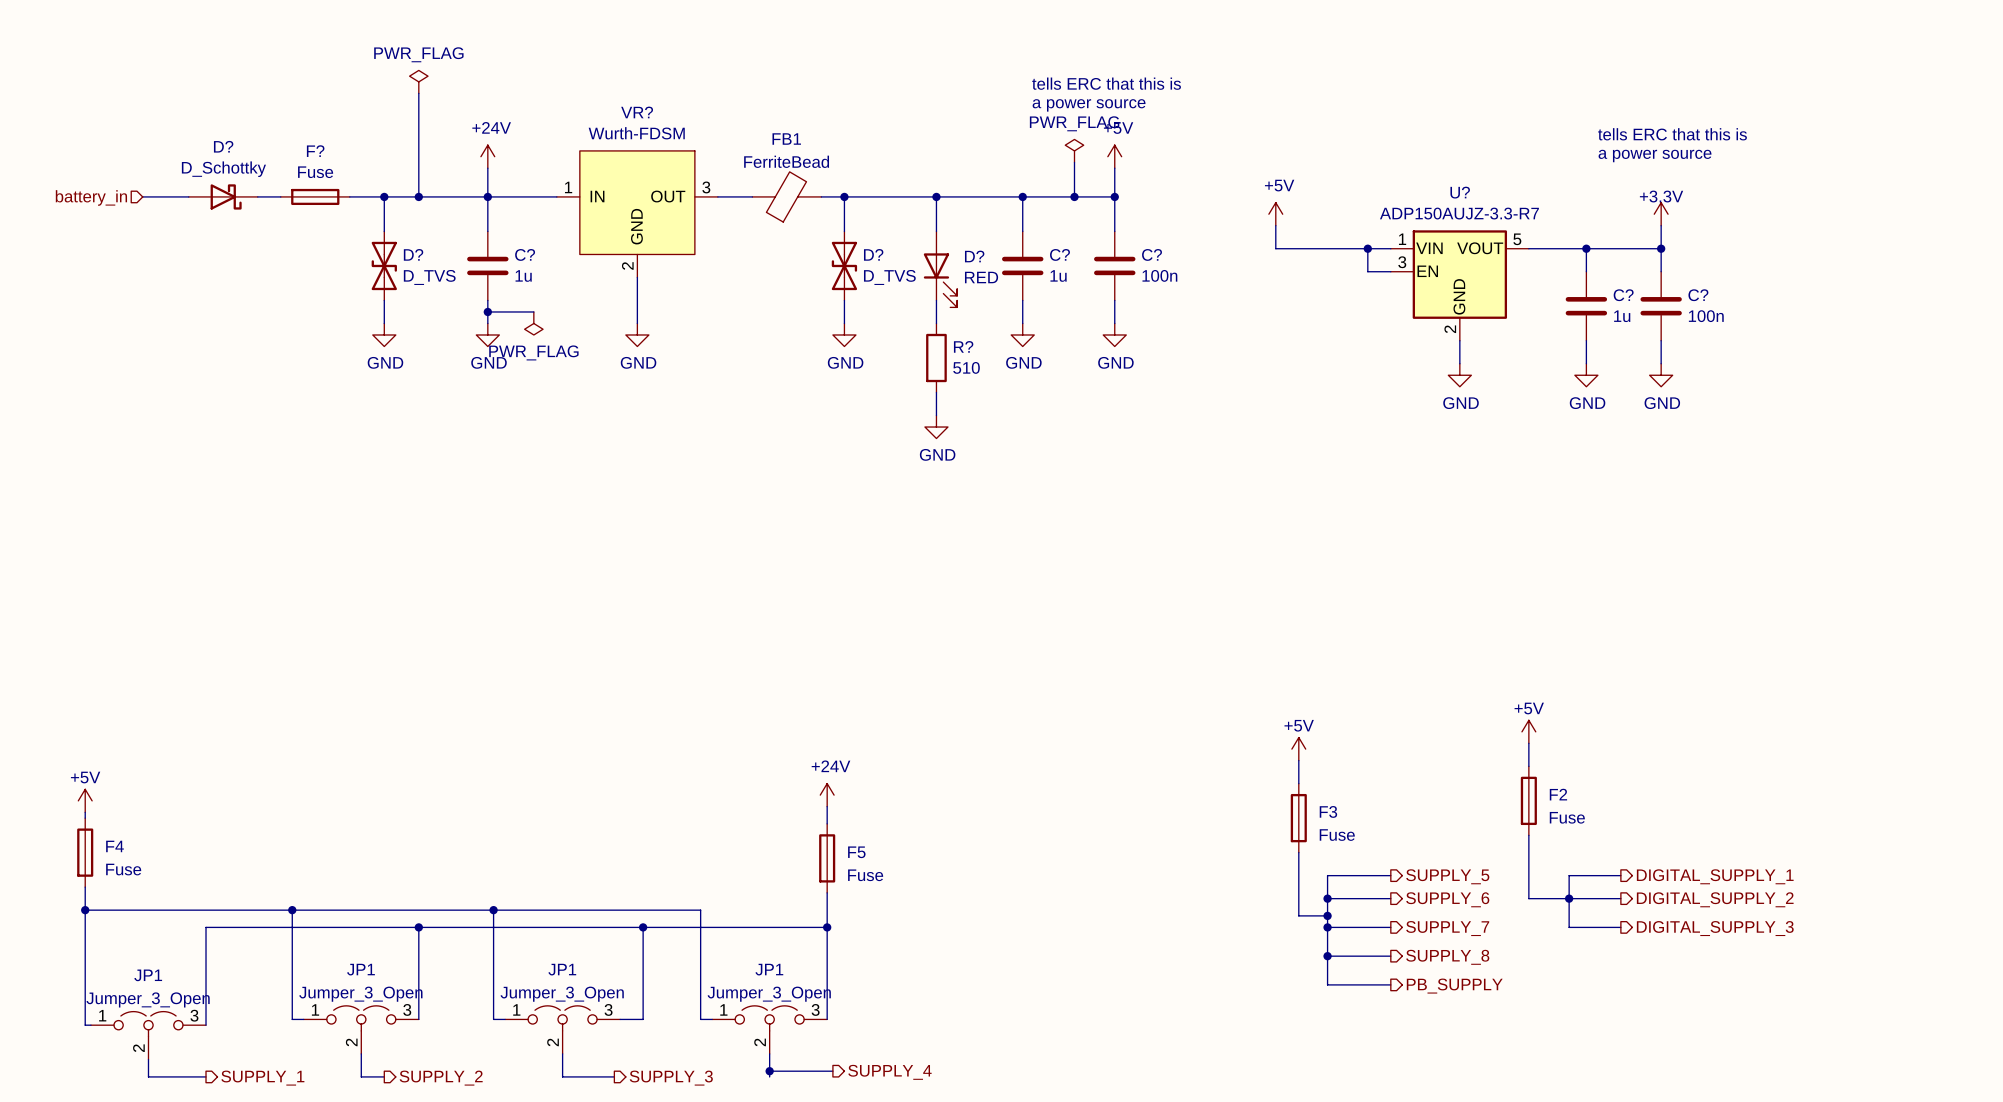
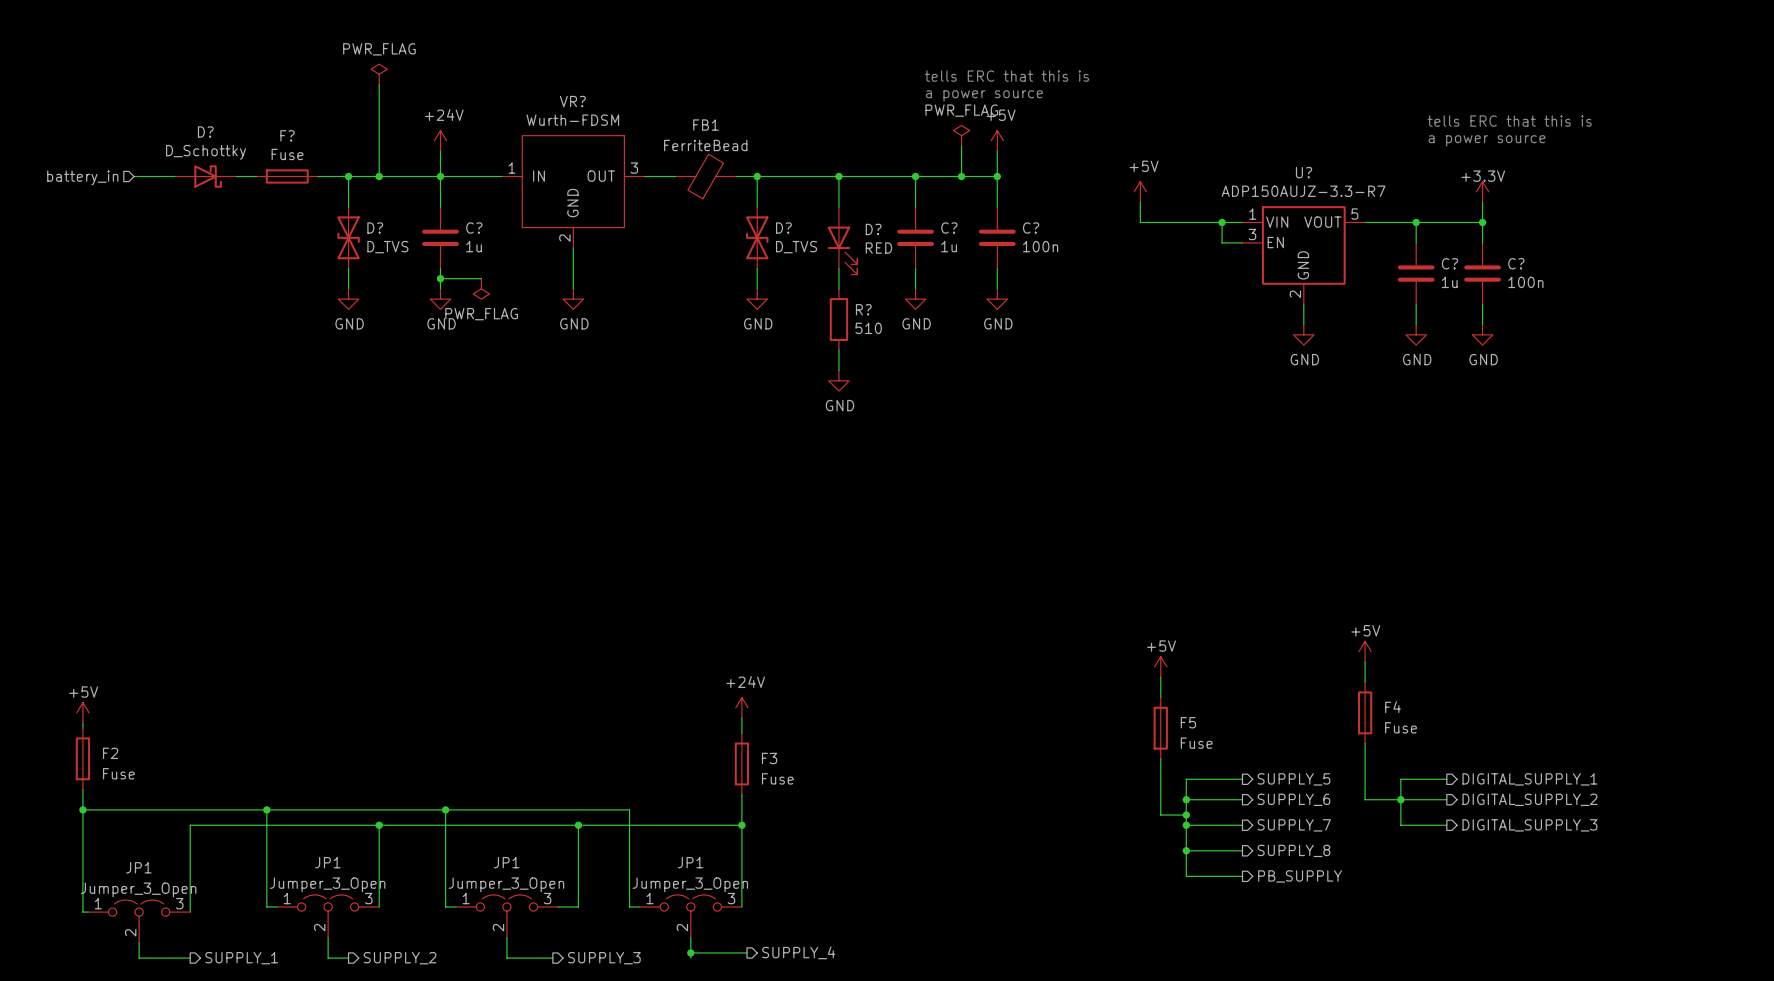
F2 name: F2 (1558, 794) -> F4 (1393, 707)
F3 name: F3 (1328, 811) -> F5 (1188, 722)
F4 name: F4 (114, 846) -> F2 (110, 753)
F5 name: F5 (856, 852) -> F3 (769, 758)

